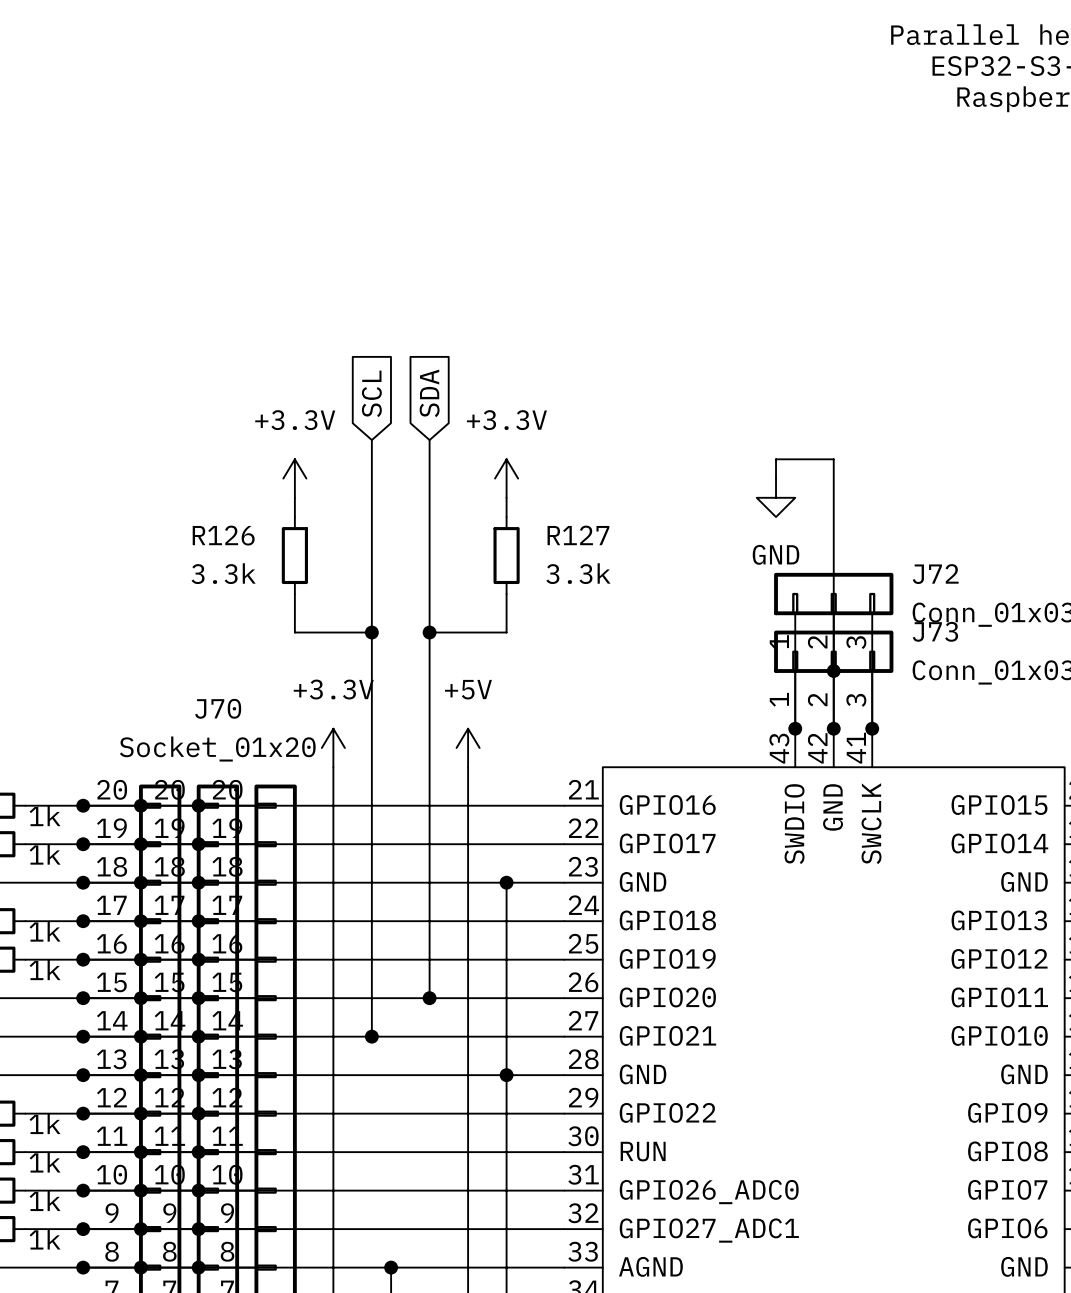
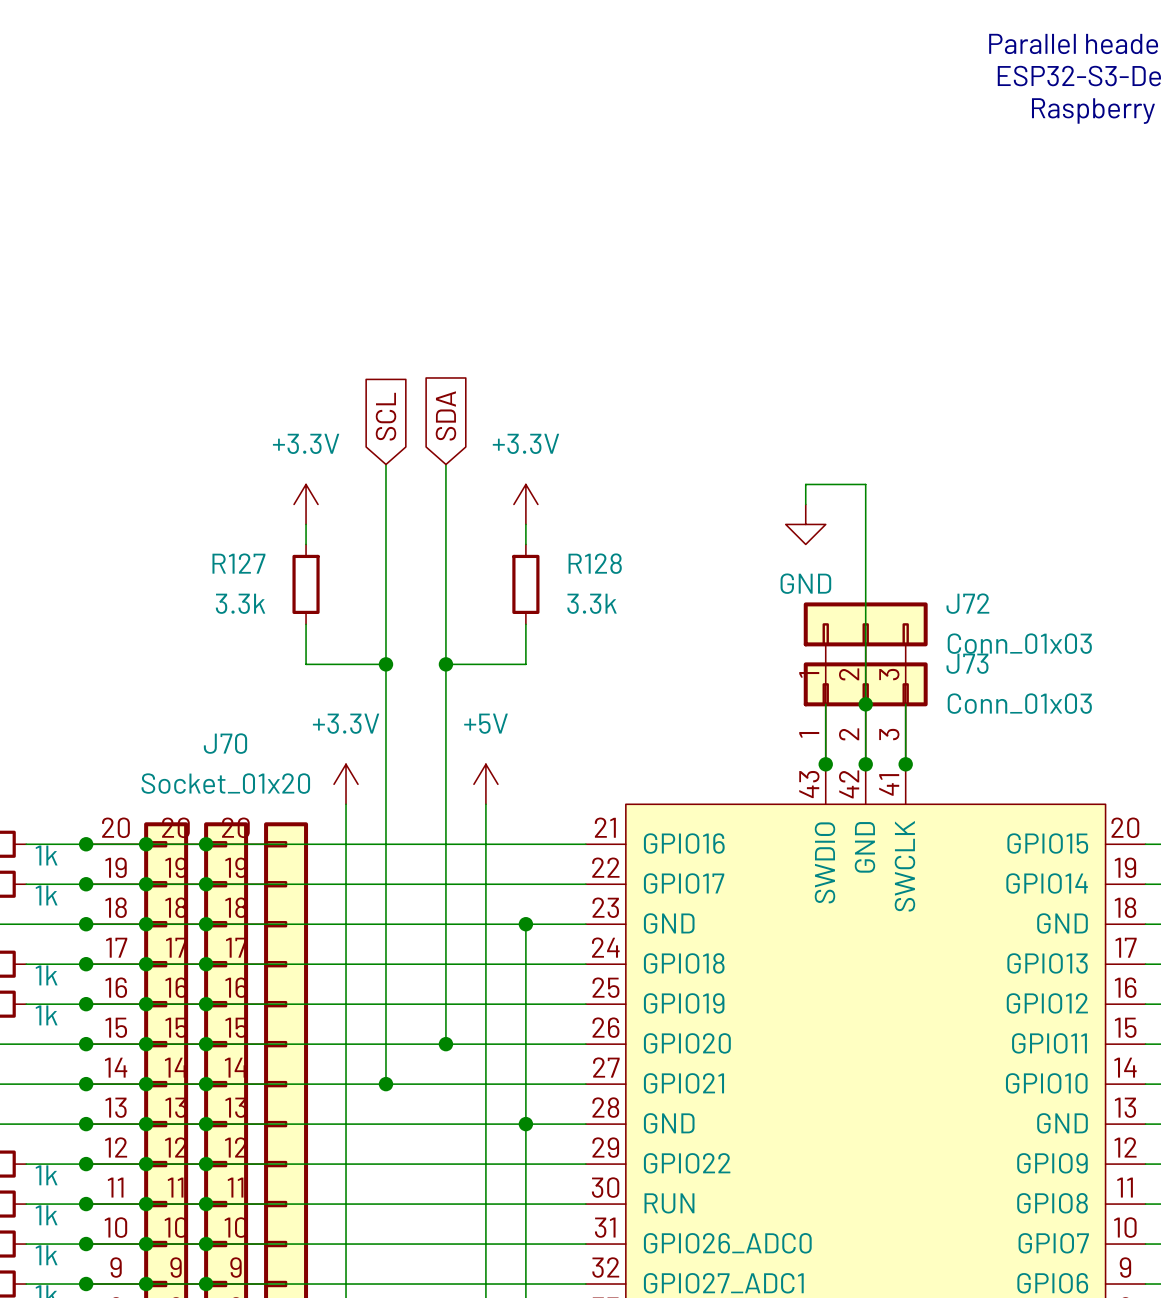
R126 name: R126 (223, 535) -> R127 (238, 563)
R127 name: R127 (578, 535) -> R128 (595, 563)

